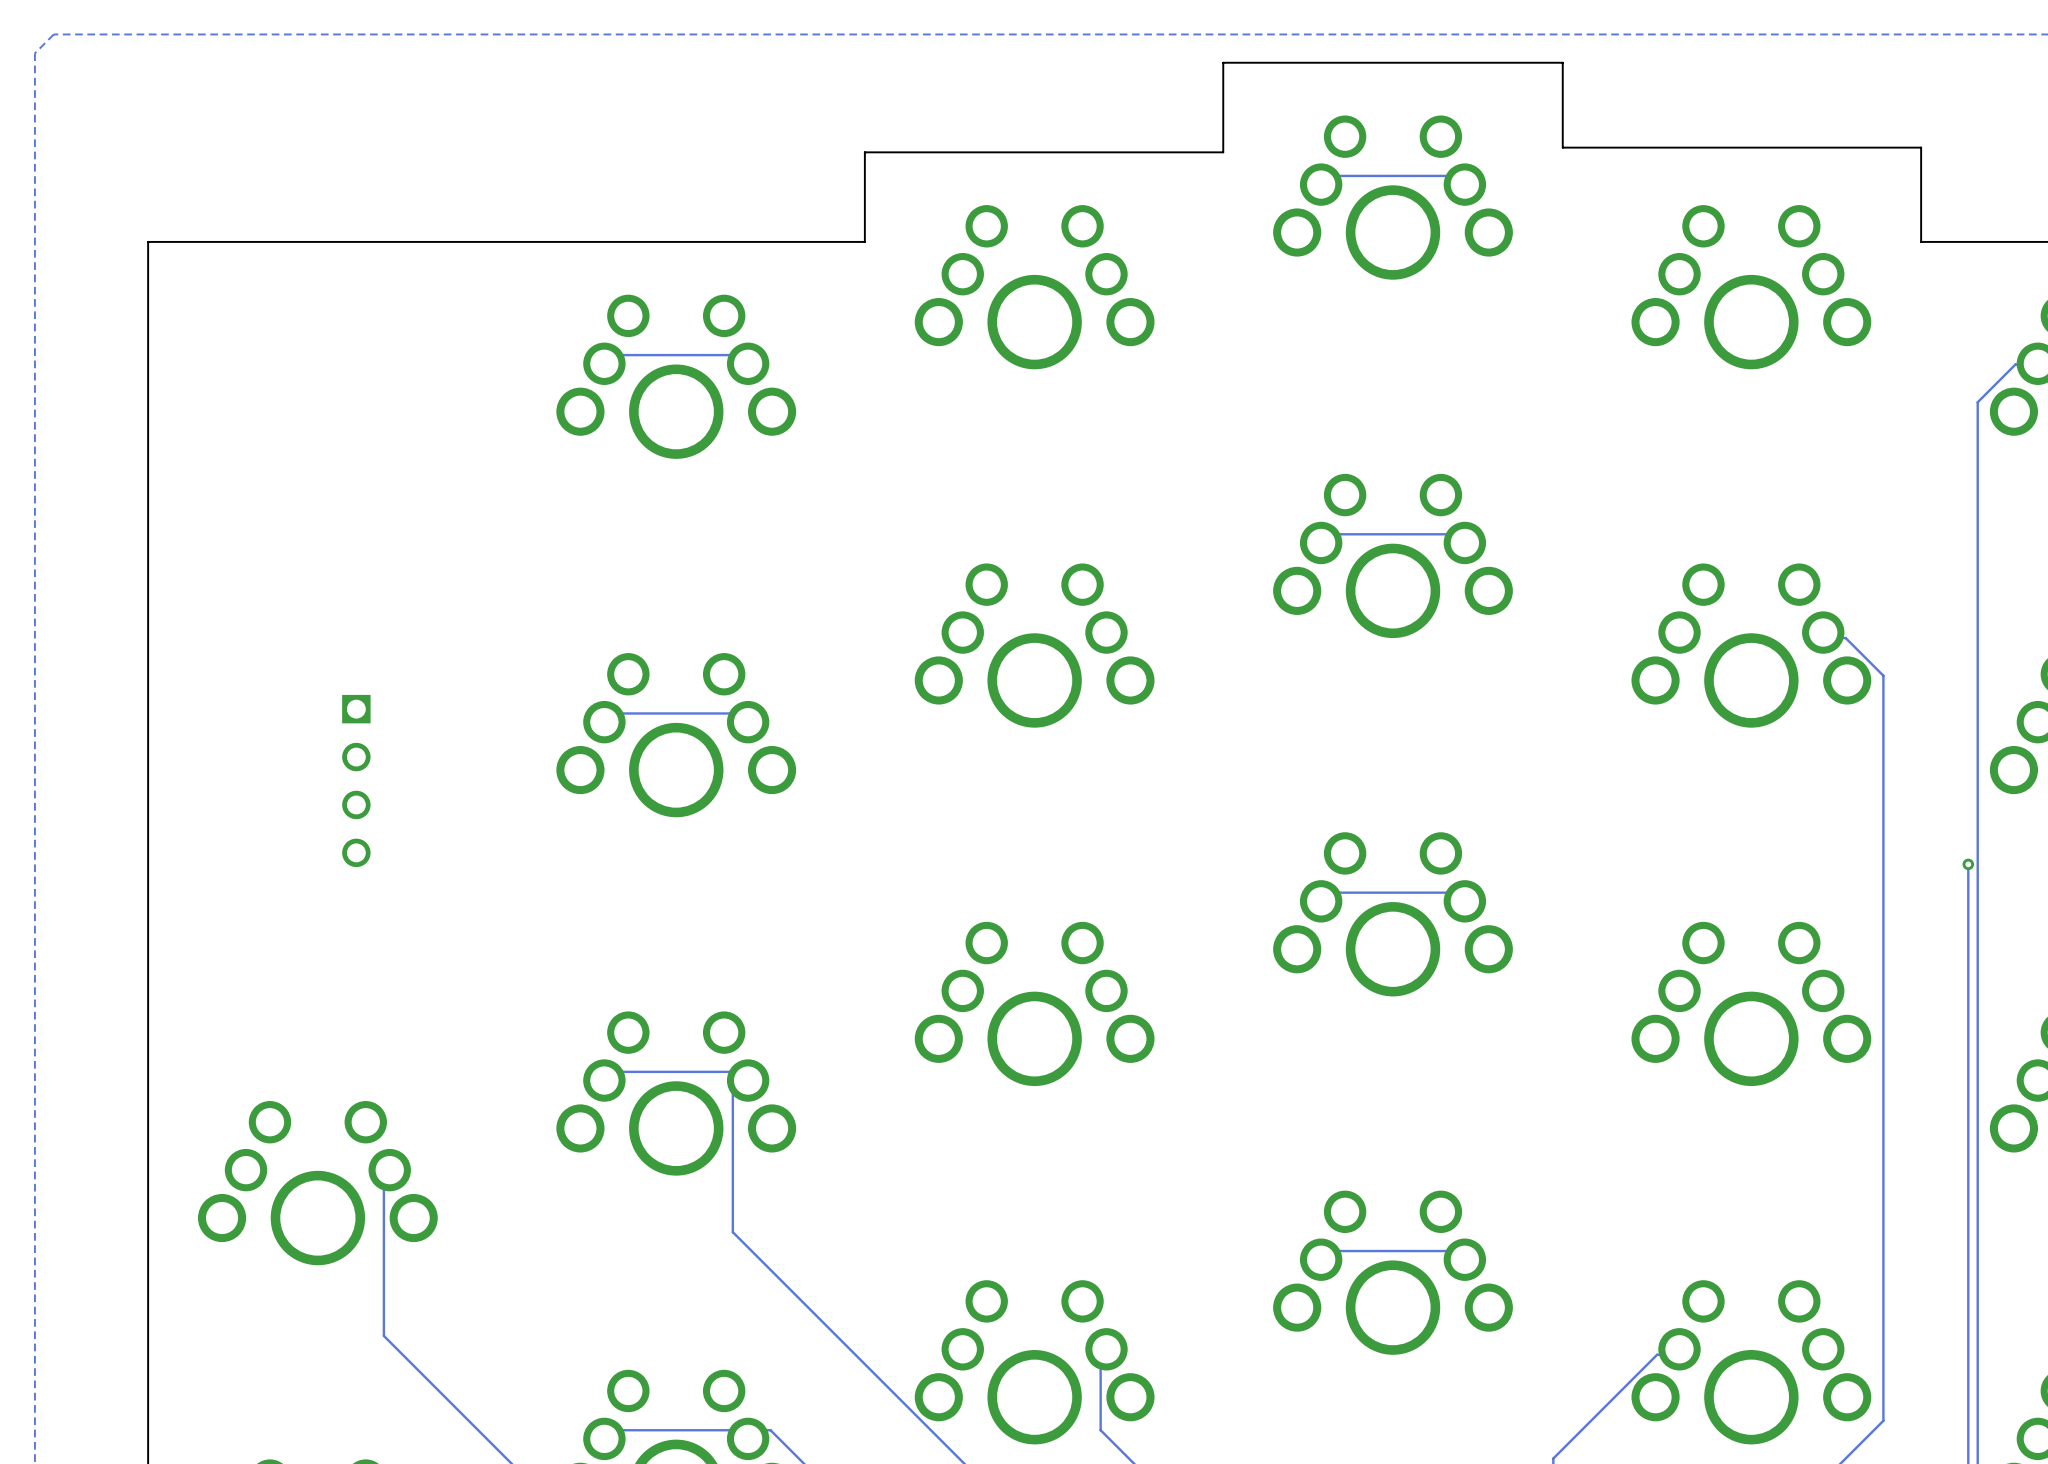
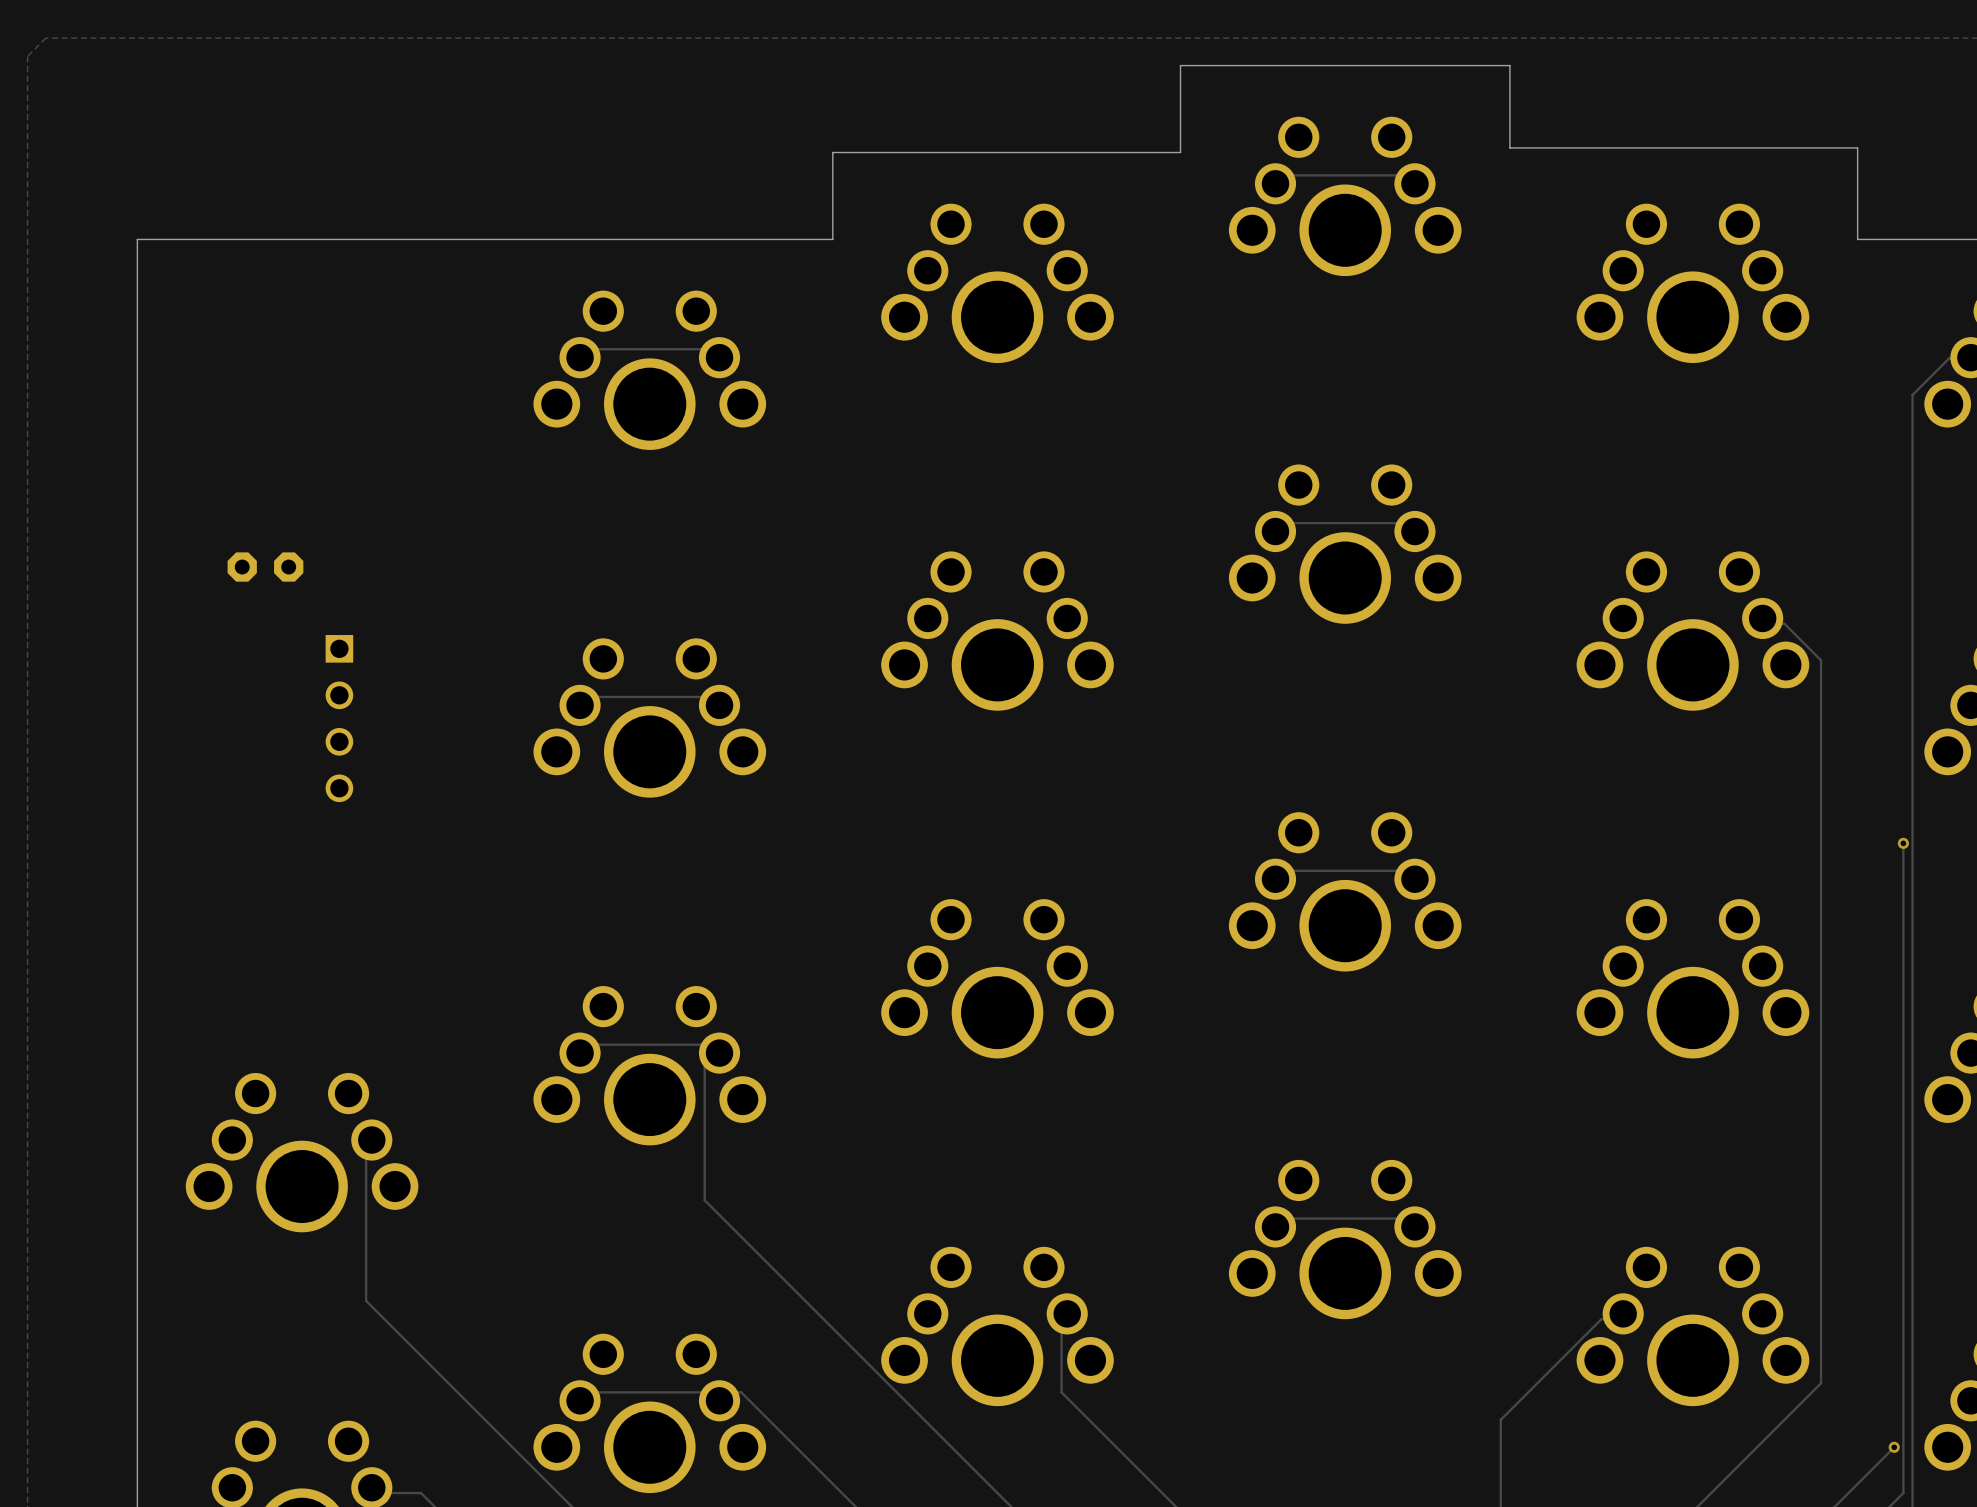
part: none -> (265, 567)
part position: (356, 781) -> (339, 718)

